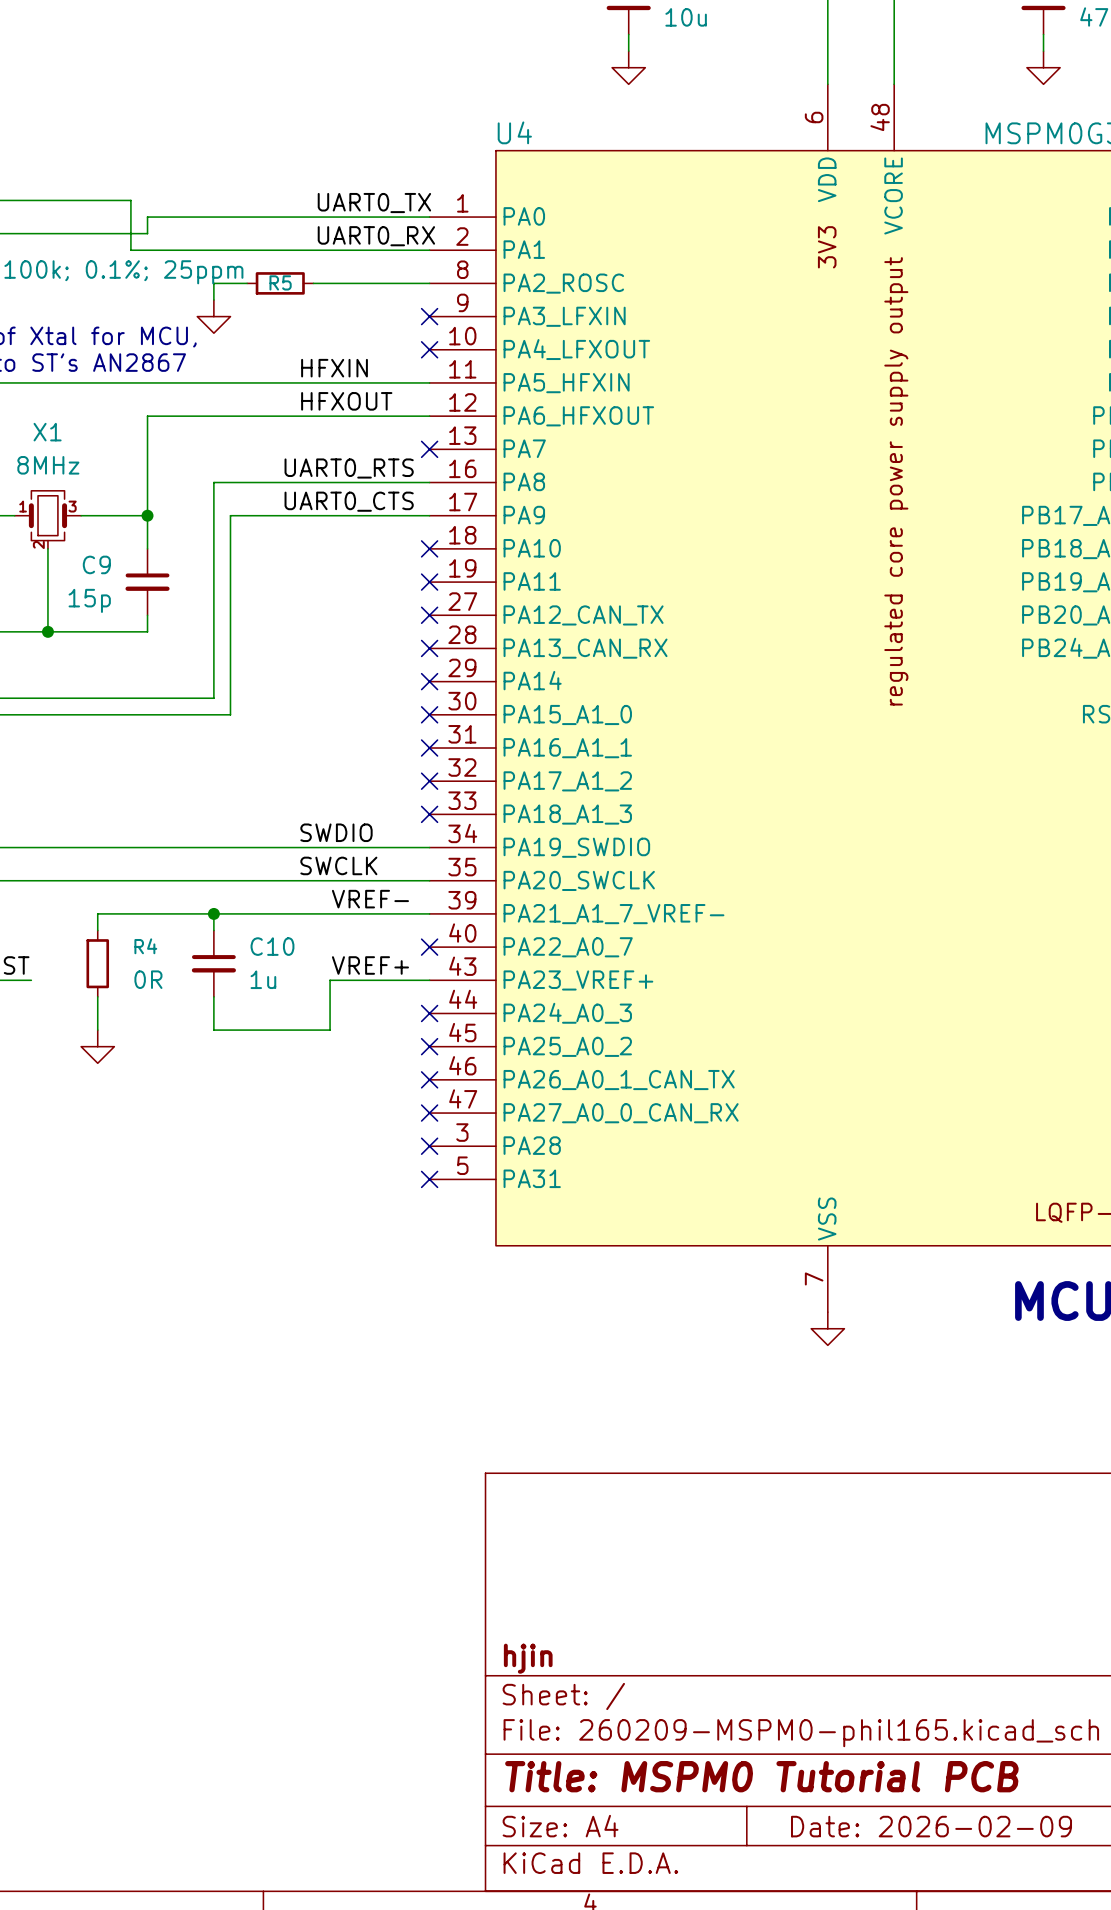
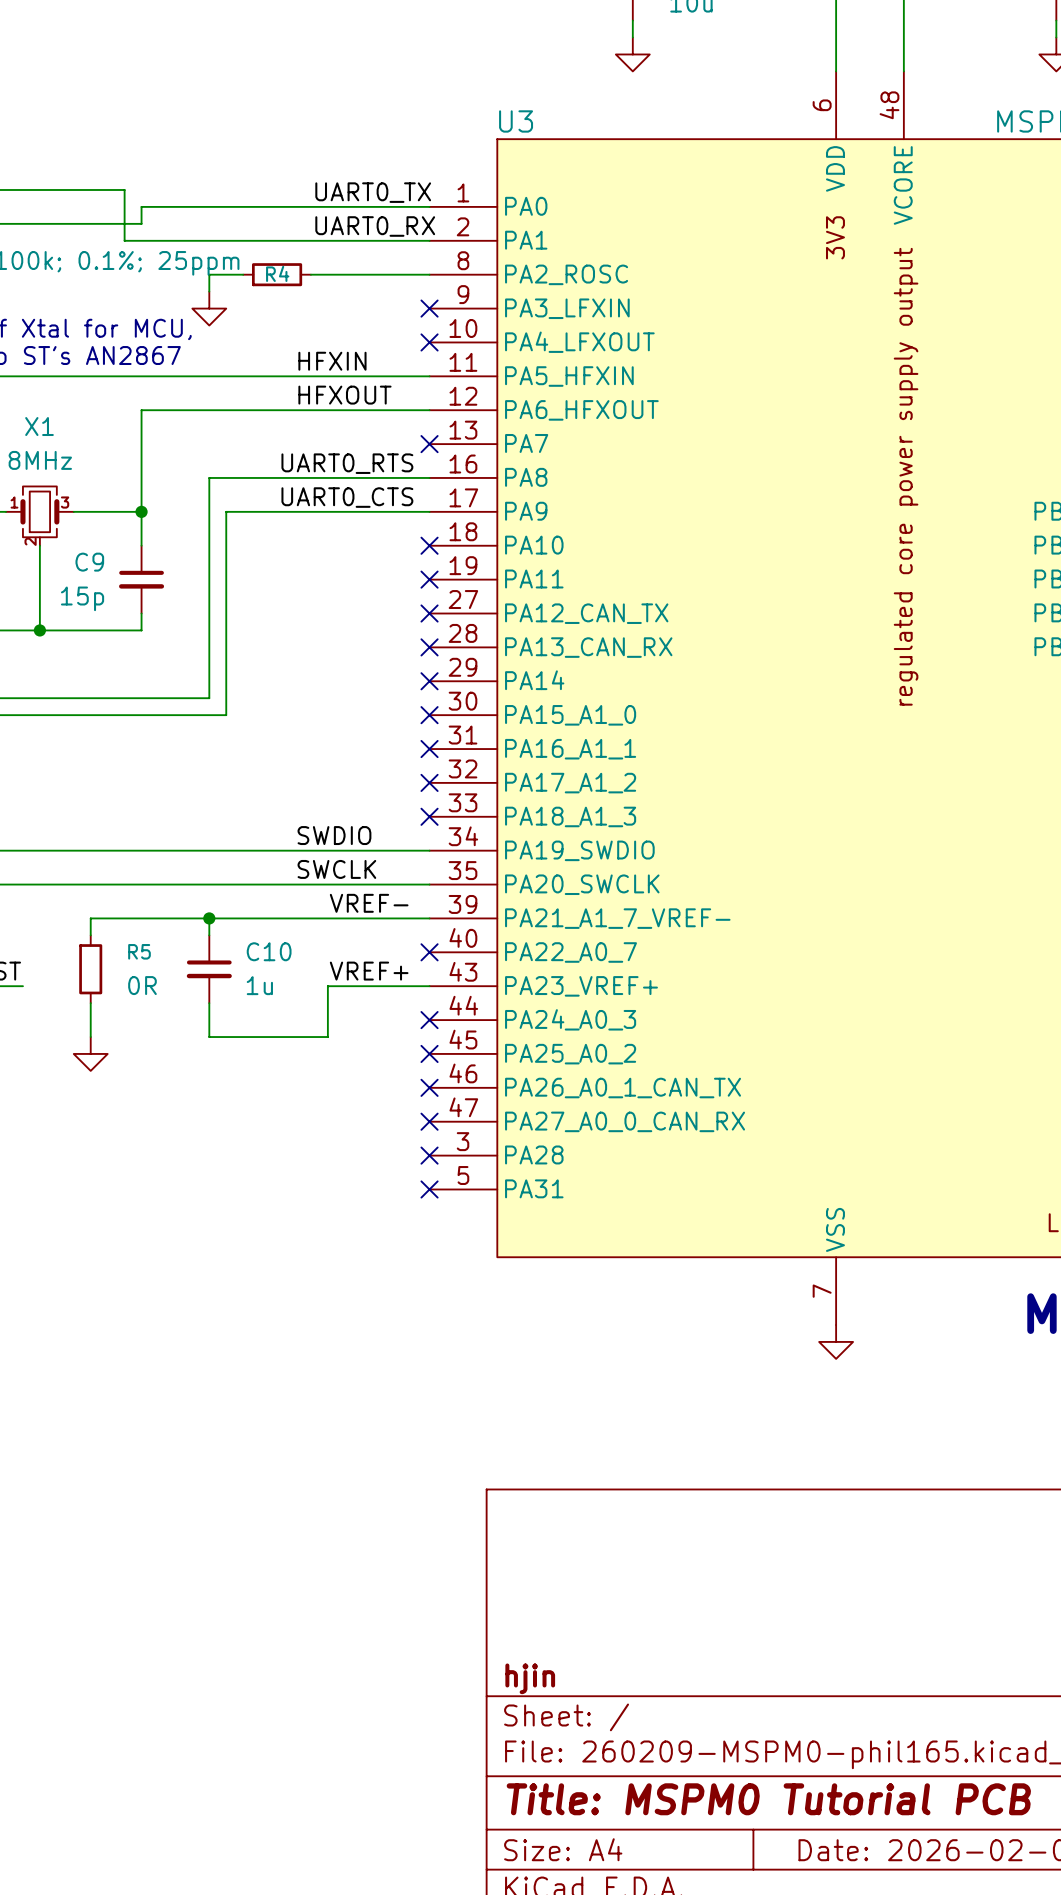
U4 name: U4 (514, 132) -> U3 (516, 121)
R5 name: R5 (280, 282) -> R4 (277, 273)
R4 name: R4 (145, 946) -> R5 (139, 951)

